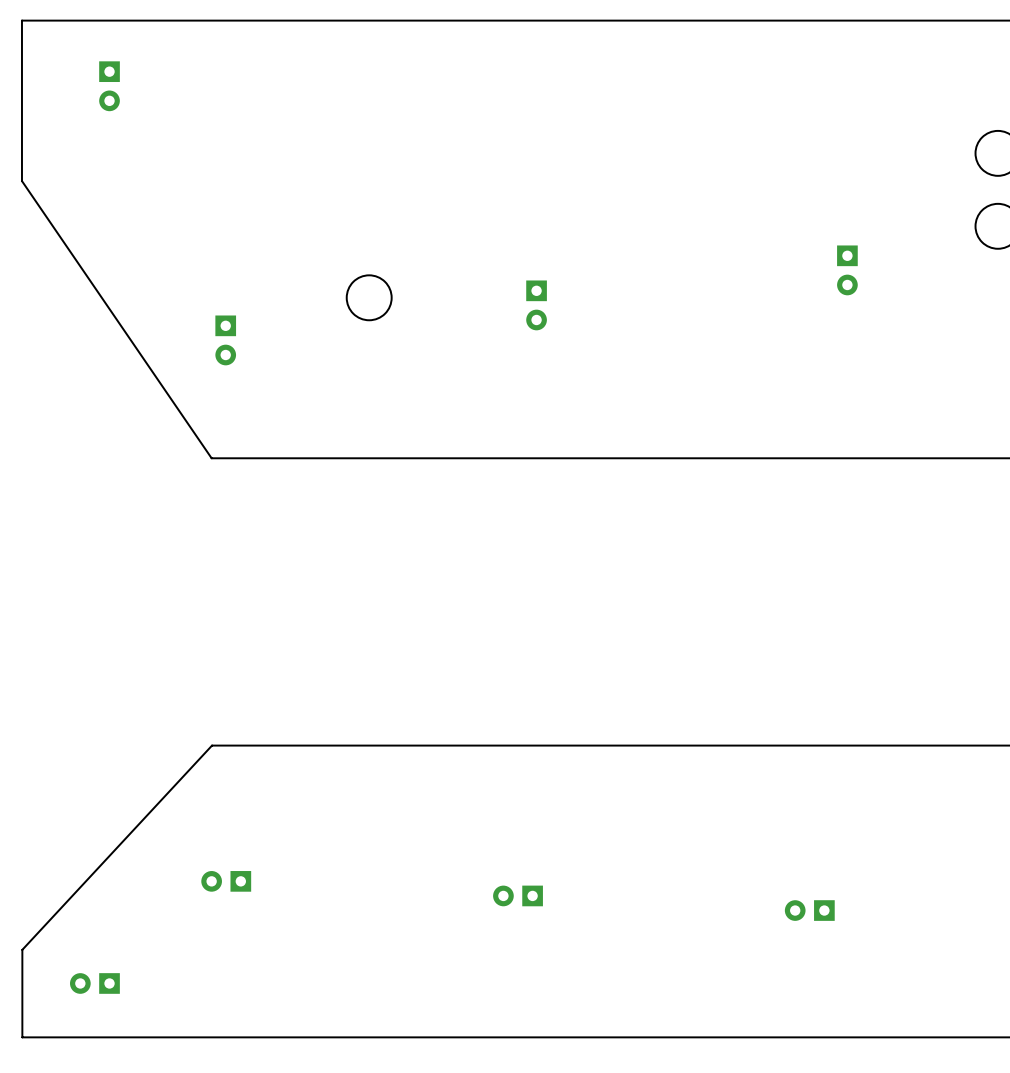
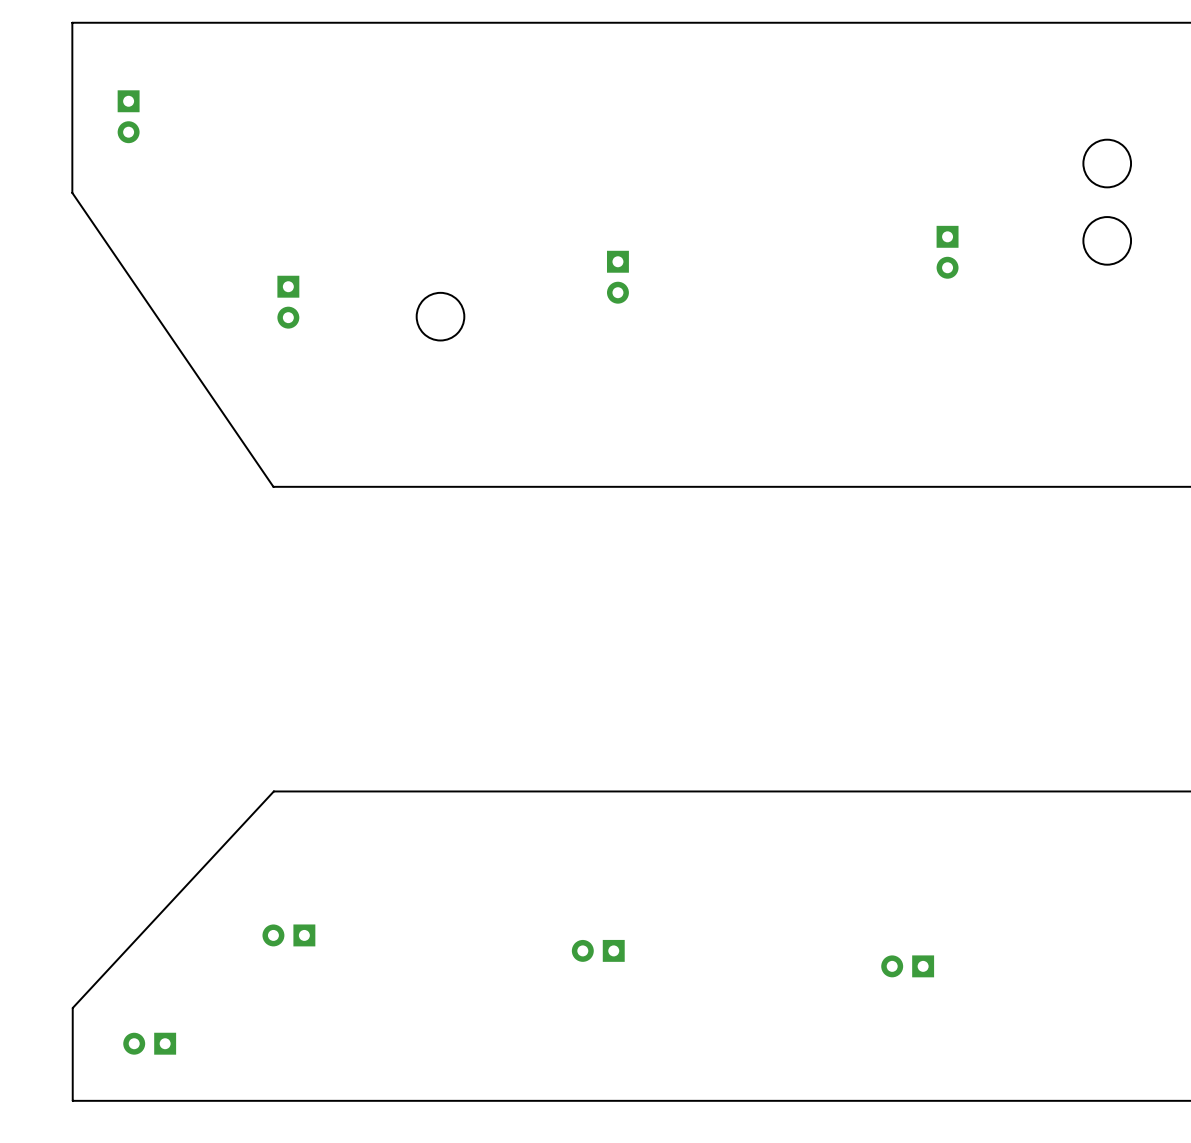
part position: (109, 86) -> (128, 116)
part position: (847, 270) -> (947, 252)
part position: (536, 305) -> (617, 277)
part position: (225, 340) -> (288, 302)

